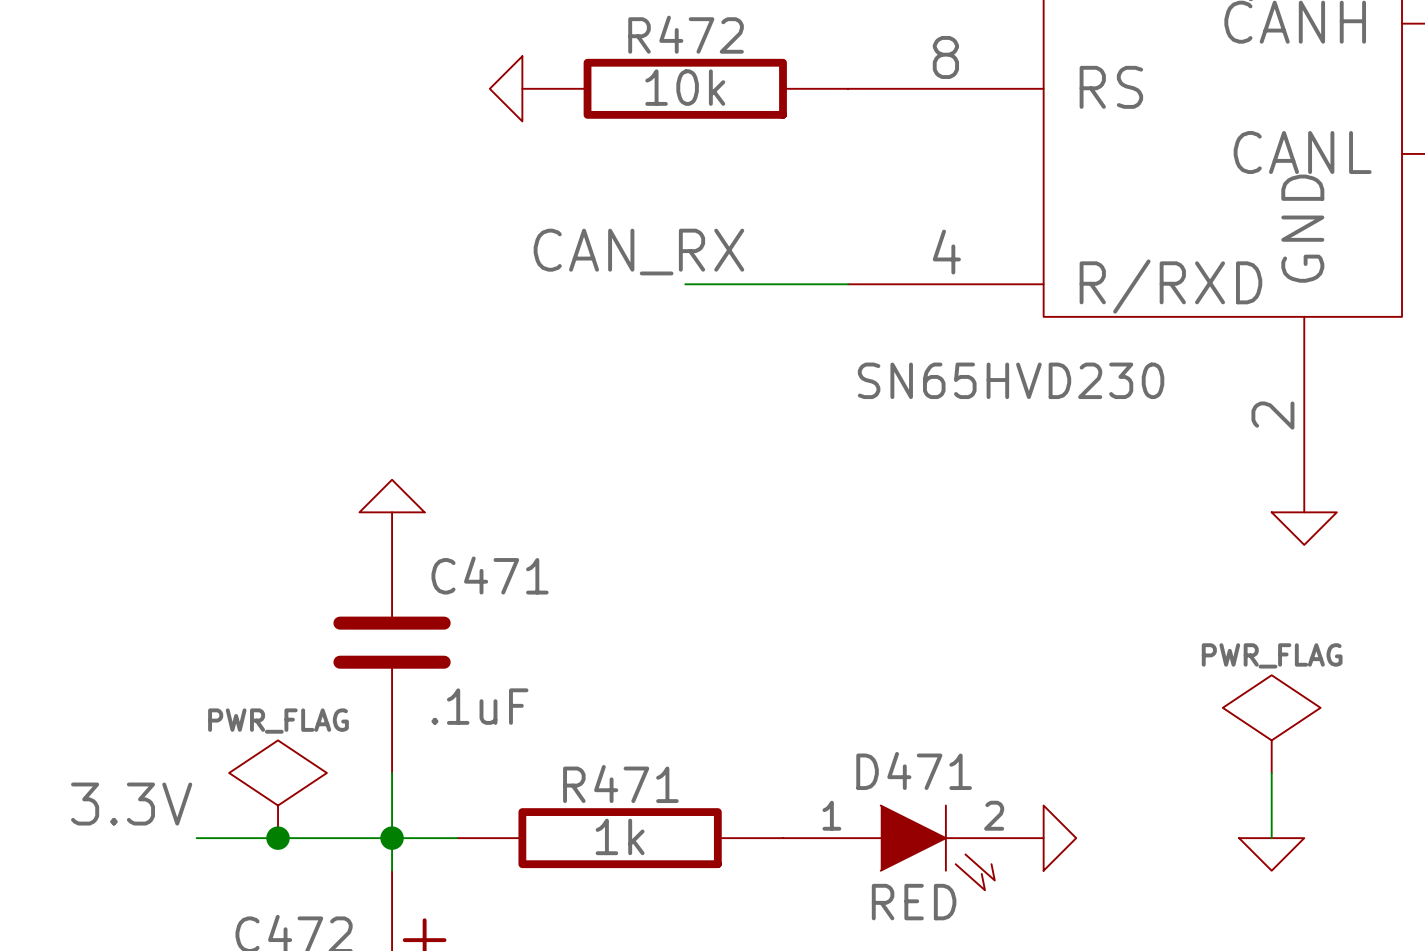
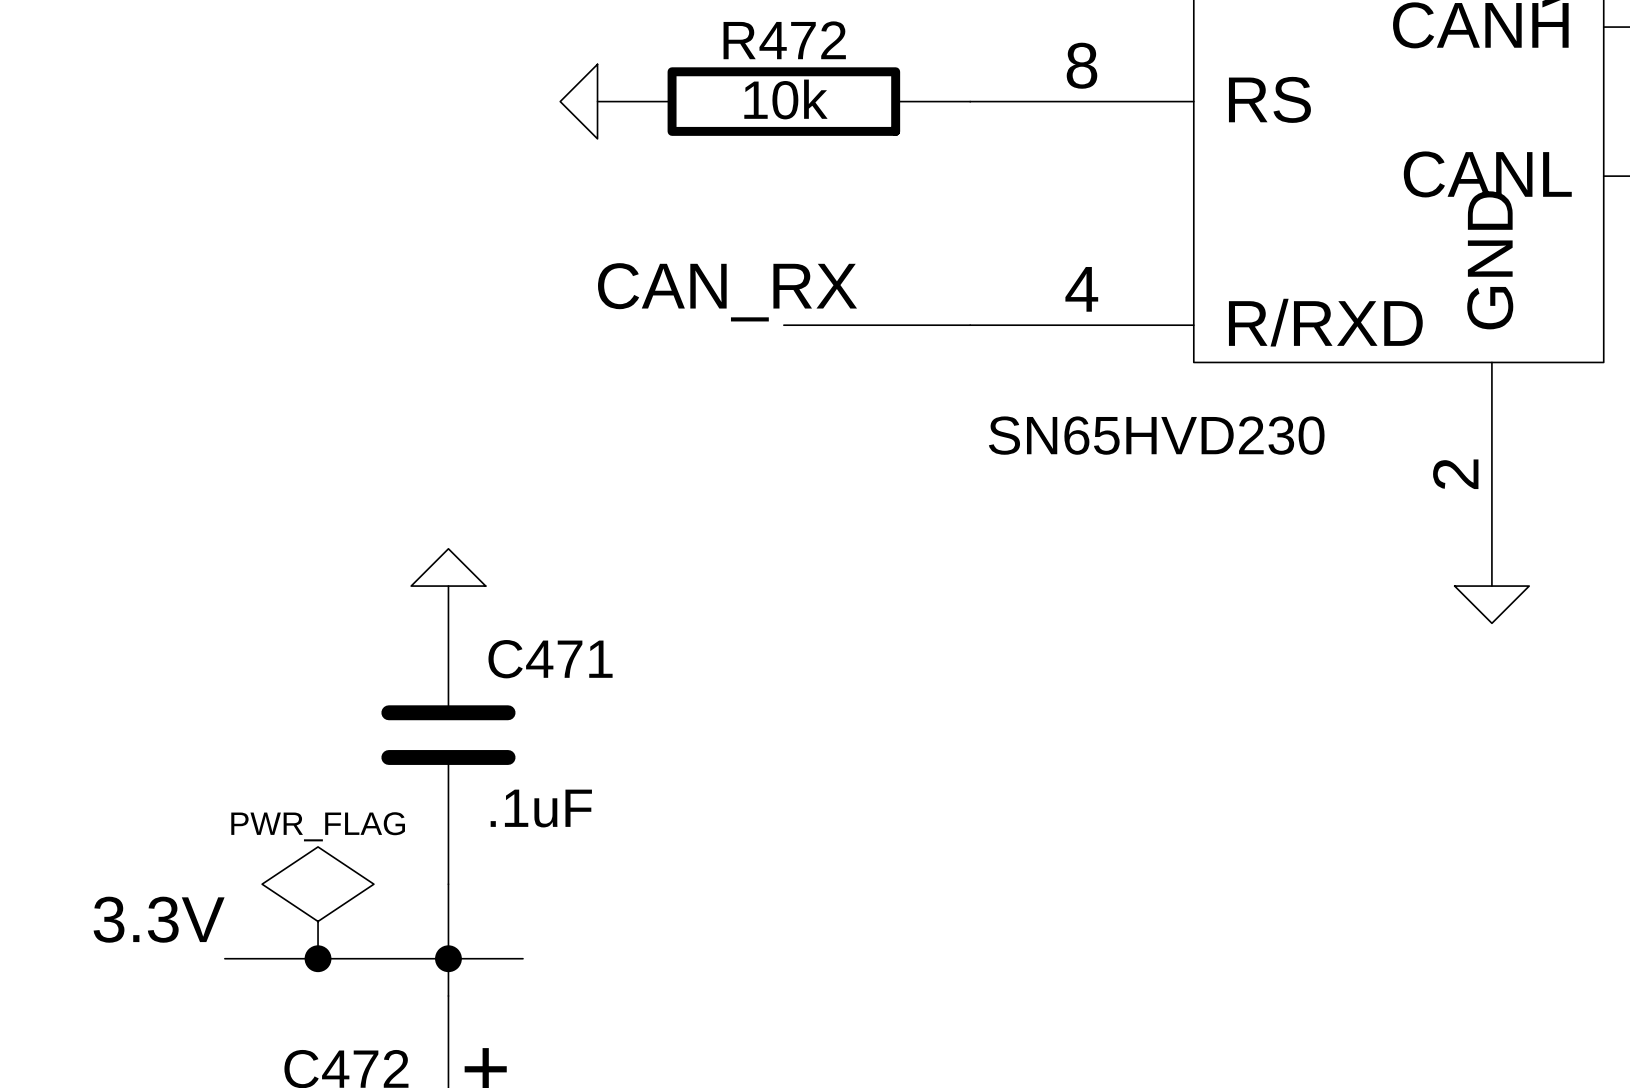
power symbol: PWR_FLAG (1271, 724) -> none
wire: (1271, 772) (1271, 838) -> none
R471: 1k (620, 838) -> none
power symbol: (1059, 838) -> none
D471: RED (913, 847) -> none
power symbol: (1271, 854) -> none

